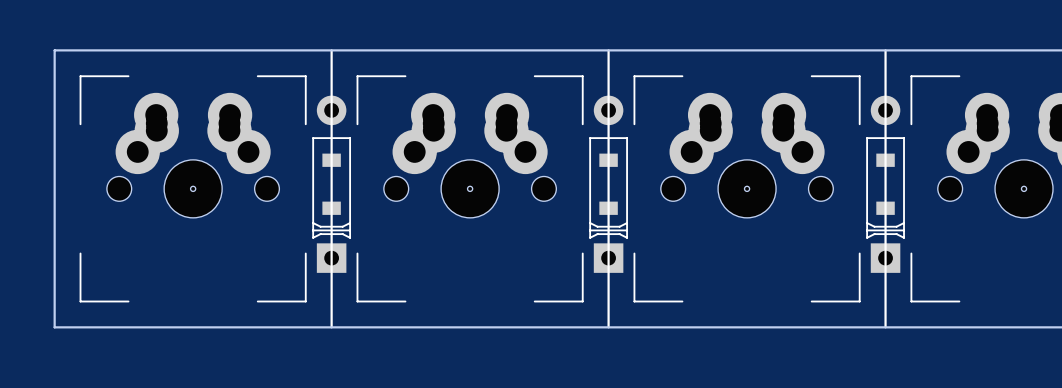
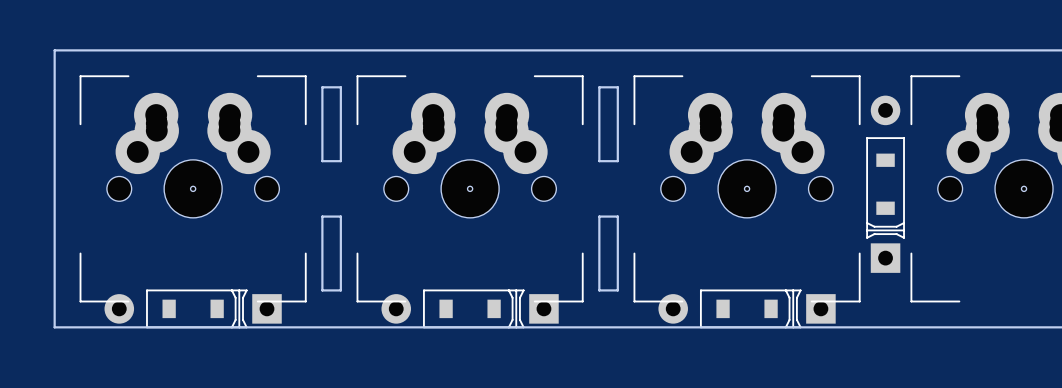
line: (331, 50) (331, 327) -> none
line: (608, 50) (608, 327) -> none
line: (885, 50) (885, 327) -> none
board edge: none -> (340, 87) (322, 87) (322, 161) (340, 161) (340, 87)
board edge: none -> (617, 87) (599, 87) (599, 161) (617, 161) (617, 87)
part: (331, 184) -> none
part: (608, 184) -> none
board edge: none -> (340, 216) (340, 290) (322, 290) (322, 216) (340, 216)
board edge: none -> (617, 216) (599, 216) (599, 290) (617, 290) (617, 216)
part: none -> (193, 308)
part: none -> (470, 308)
part: none -> (747, 308)

